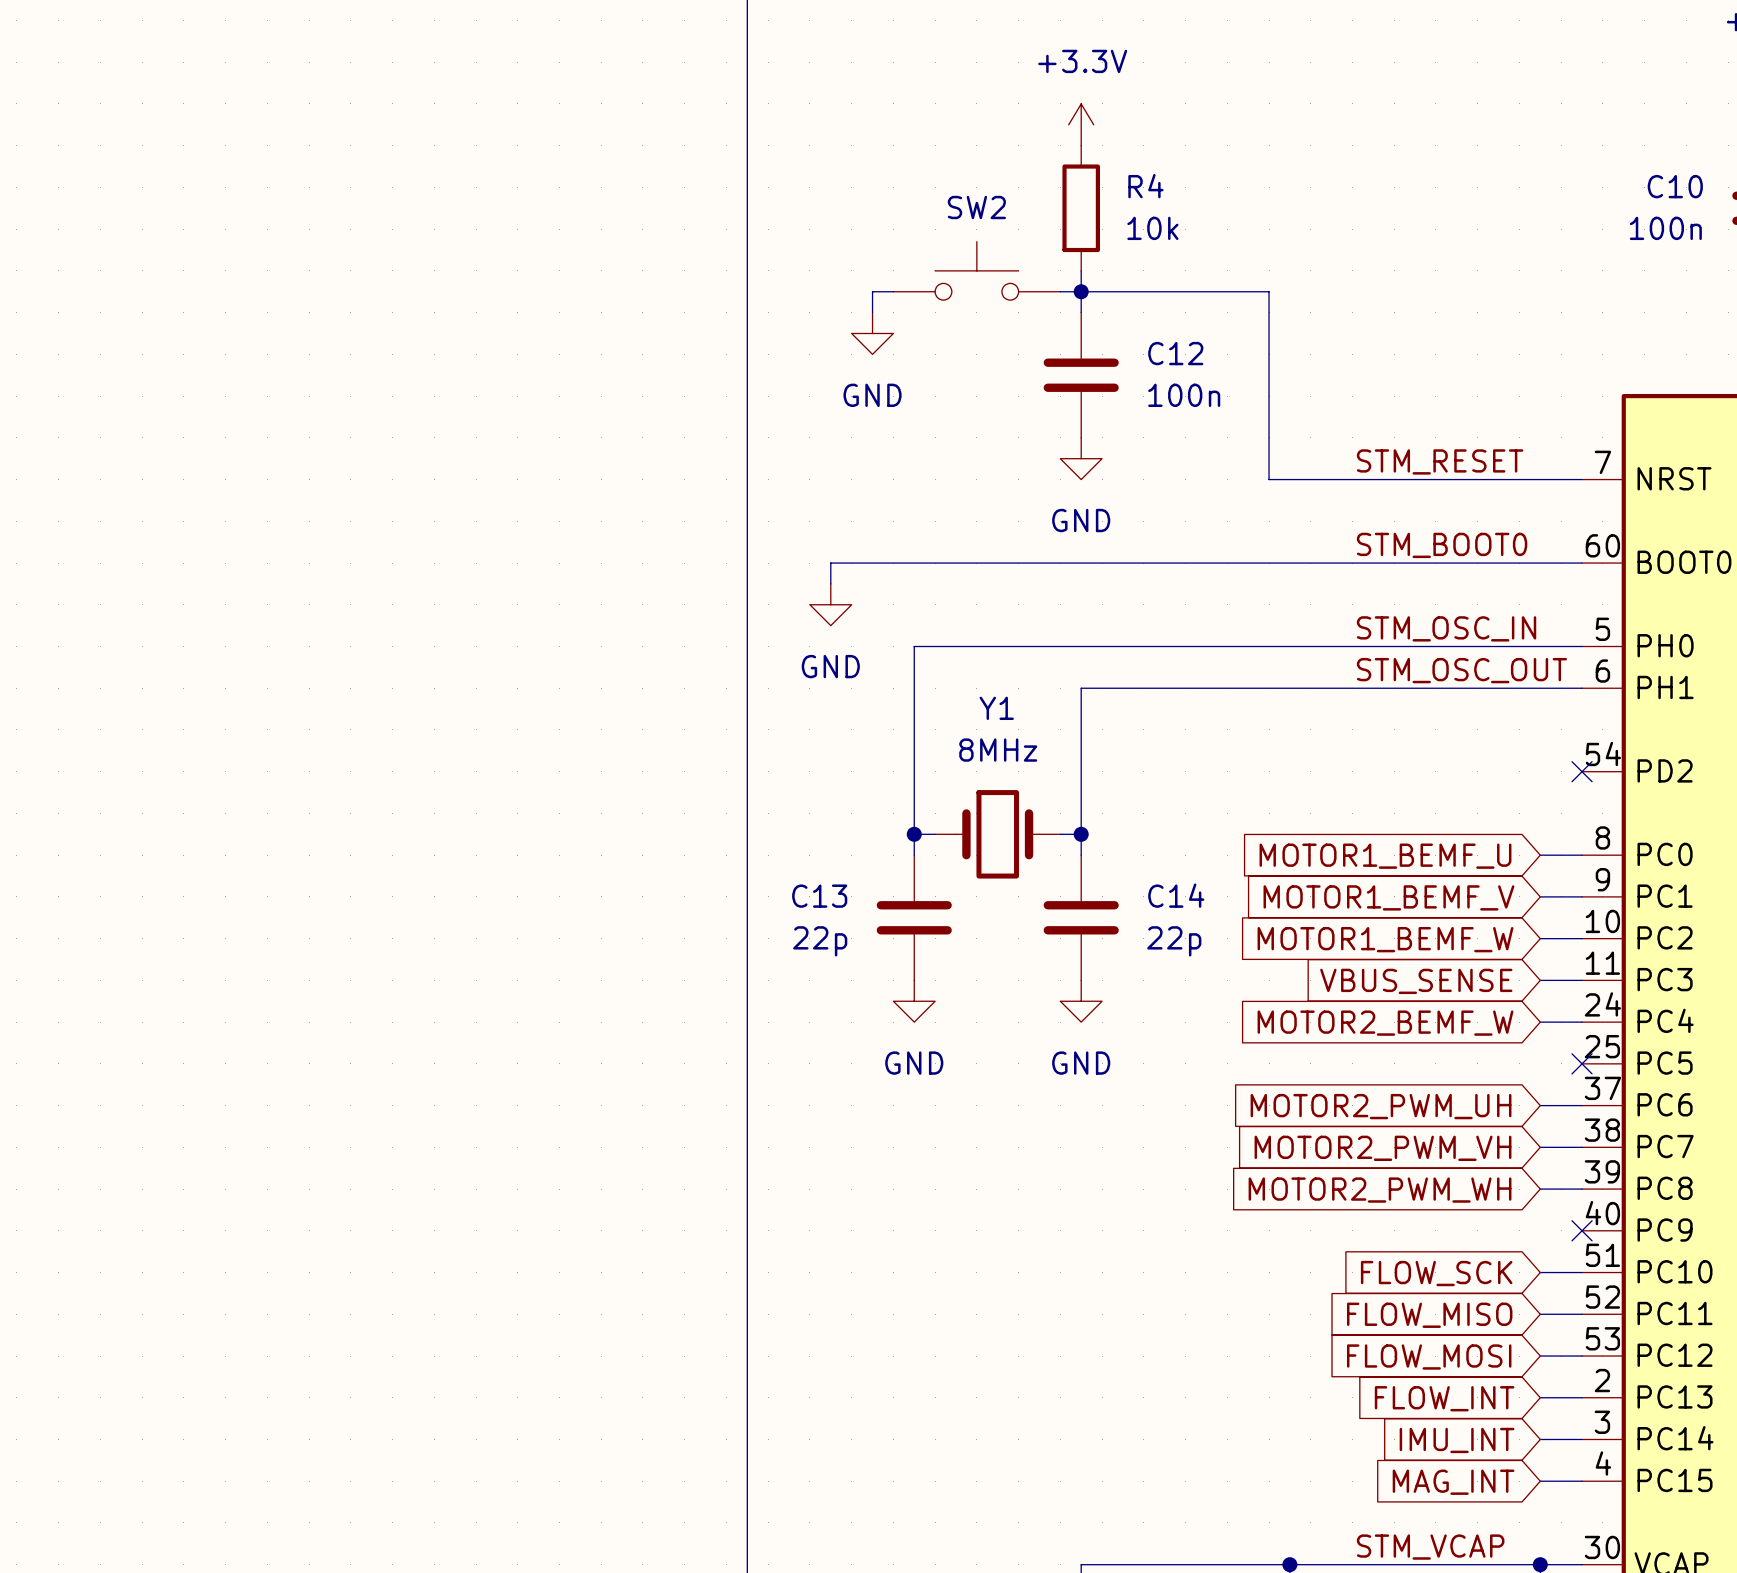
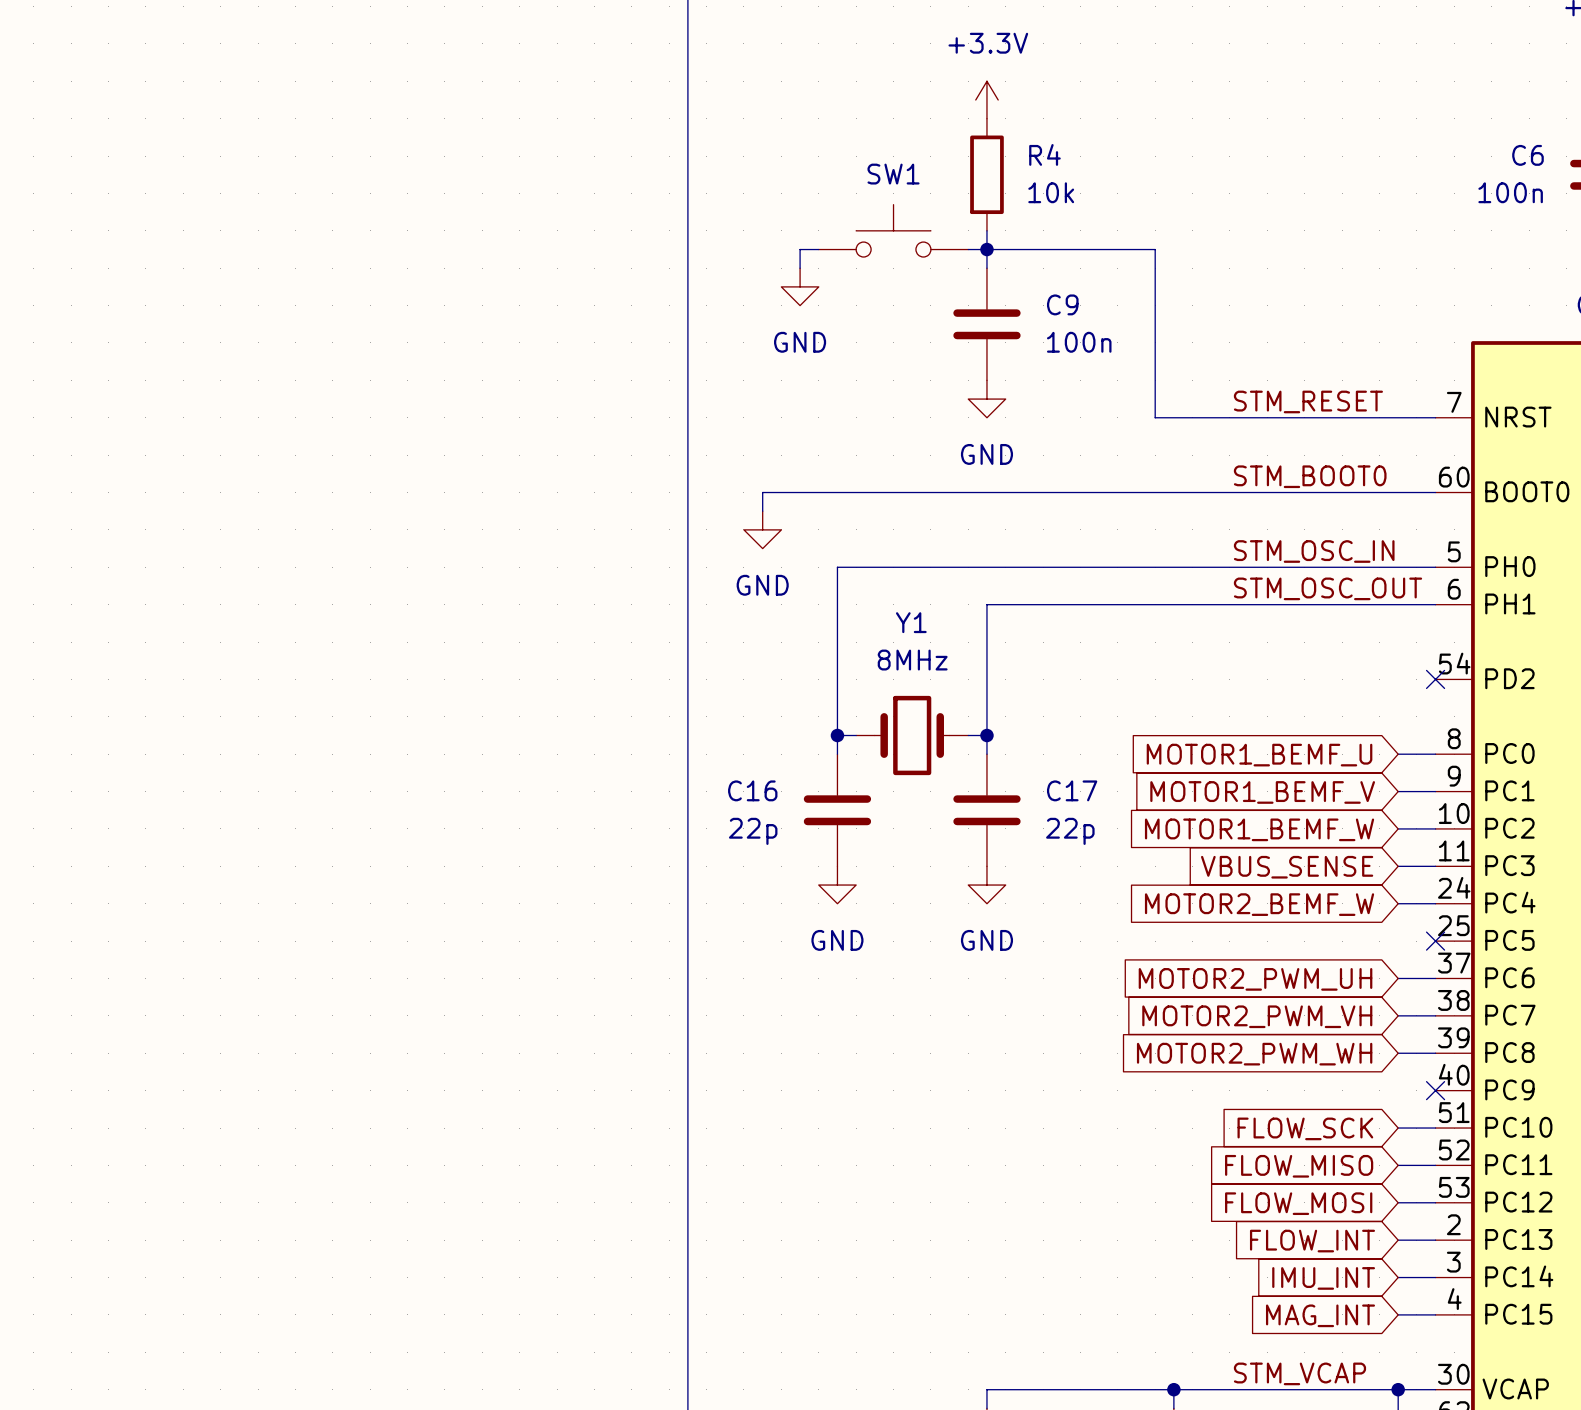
C10 name: C10 (1675, 186) -> C6 (1527, 155)
SW2 name: SW2 (976, 207) -> SW1 (893, 174)
C12 name: C12 (1175, 353) -> C9 (1062, 304)
C14 name: C14 (1176, 895) -> C17 (1072, 790)
C13 name: C13 (819, 896) -> C16 (752, 790)

